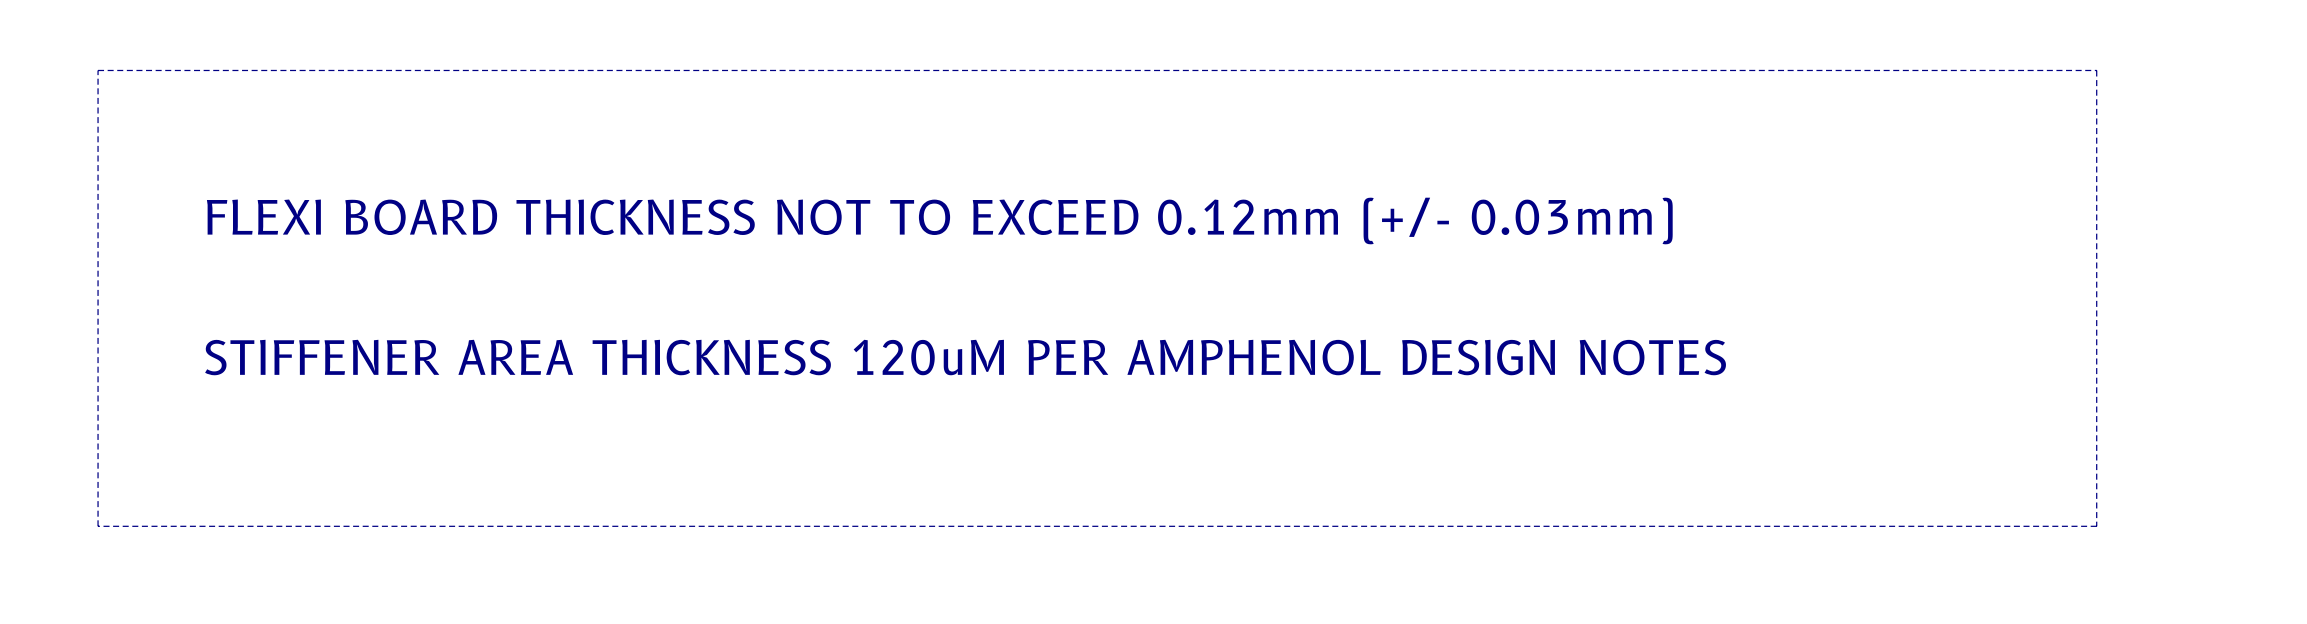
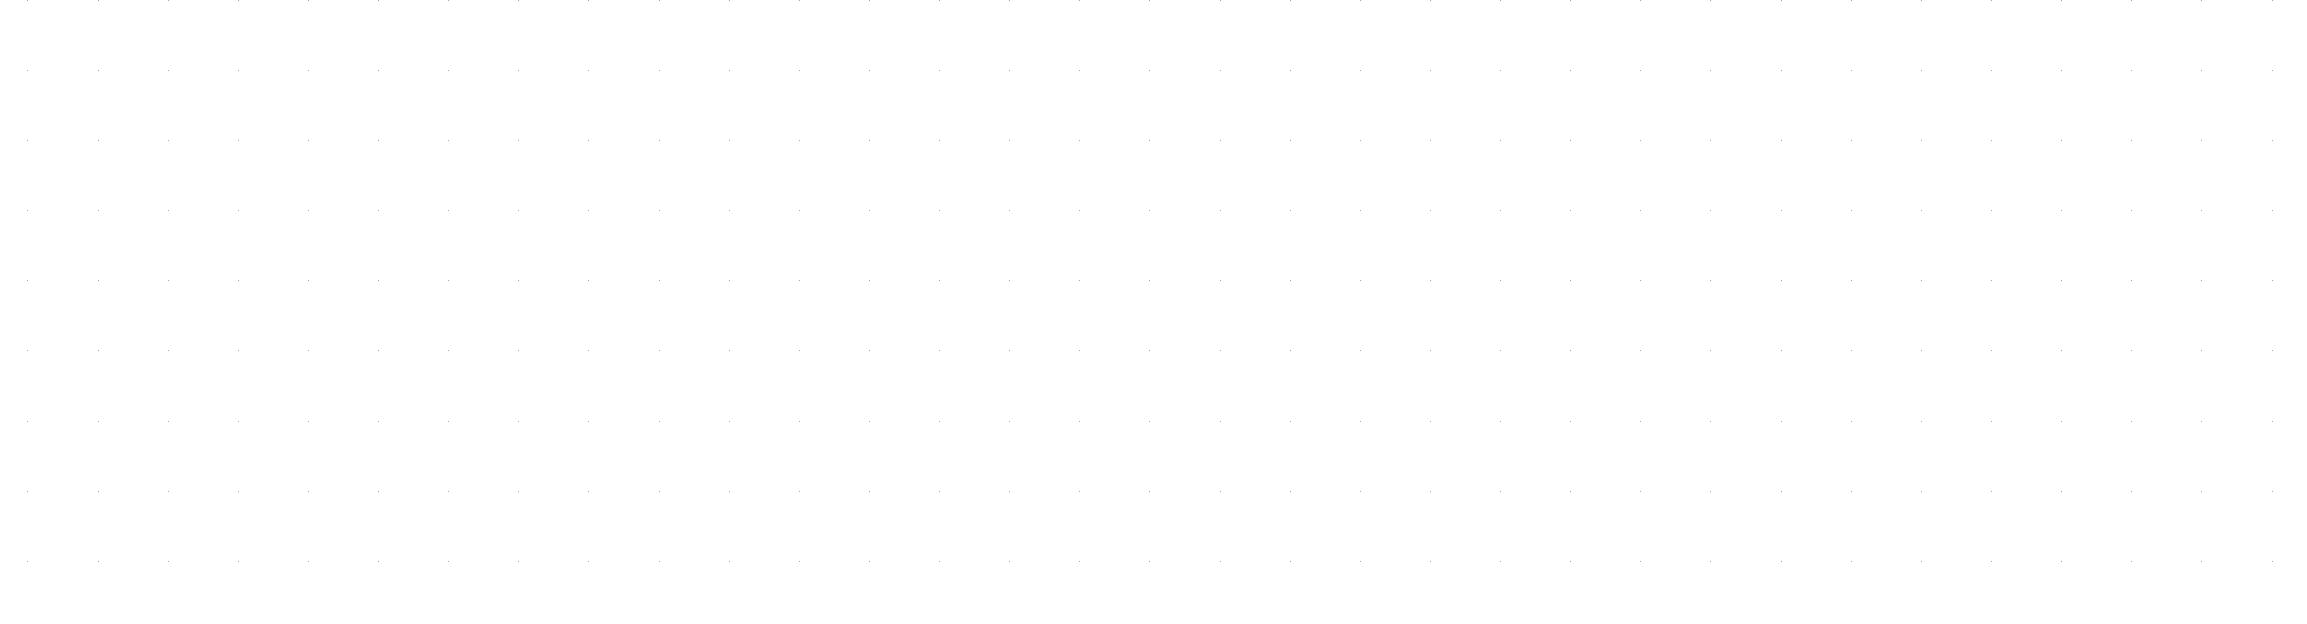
line: (98, 70) (2096, 70) (2096, 526) (98, 526) (98, 70) -> none
text: FLEXI BOARD THICKNESS NOT TO EXCEED 0.12mm (+/- 0.03mm) (939, 221) -> none
text: STIFFENER AREA THICKNESS 120uM PER AMPHENOL DESIGN NOTES (965, 357) -> none

